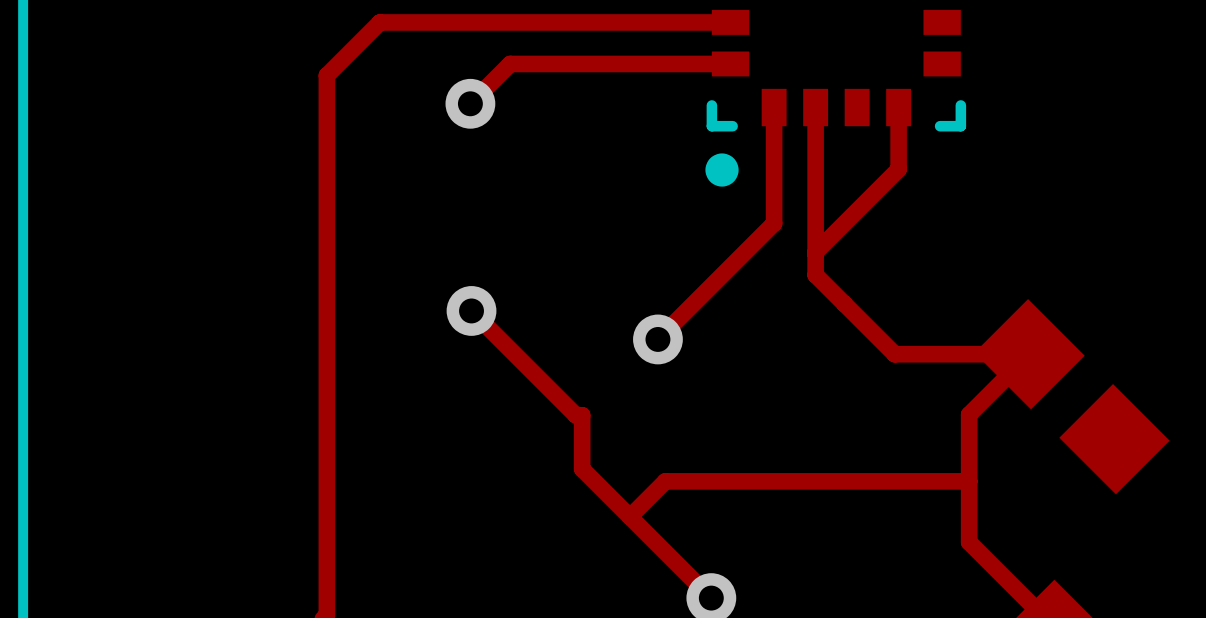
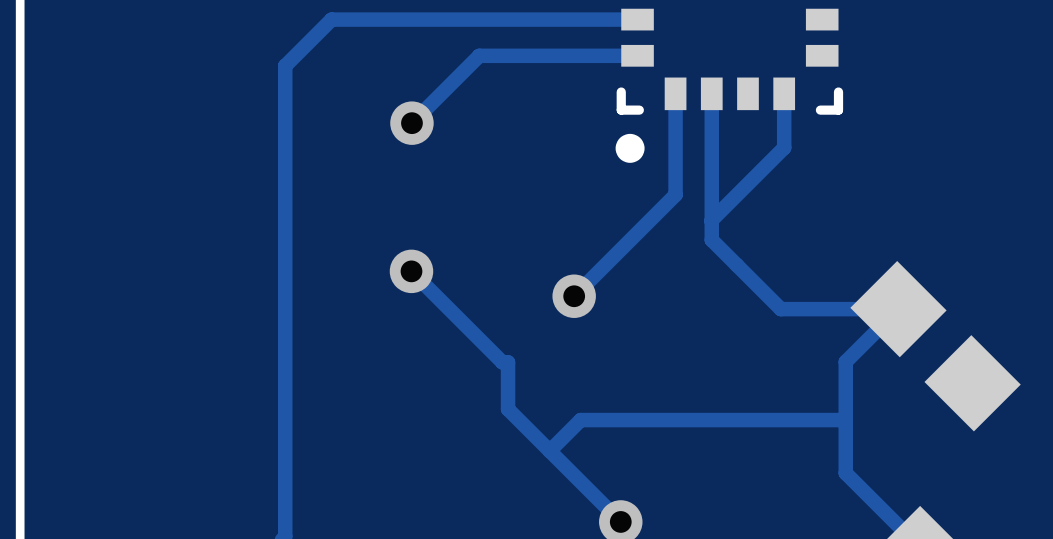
track: (549, 63) (510, 63) (470, 103) -> (479, 55) (411, 123)
via position: (470, 103) -> (411, 123)

